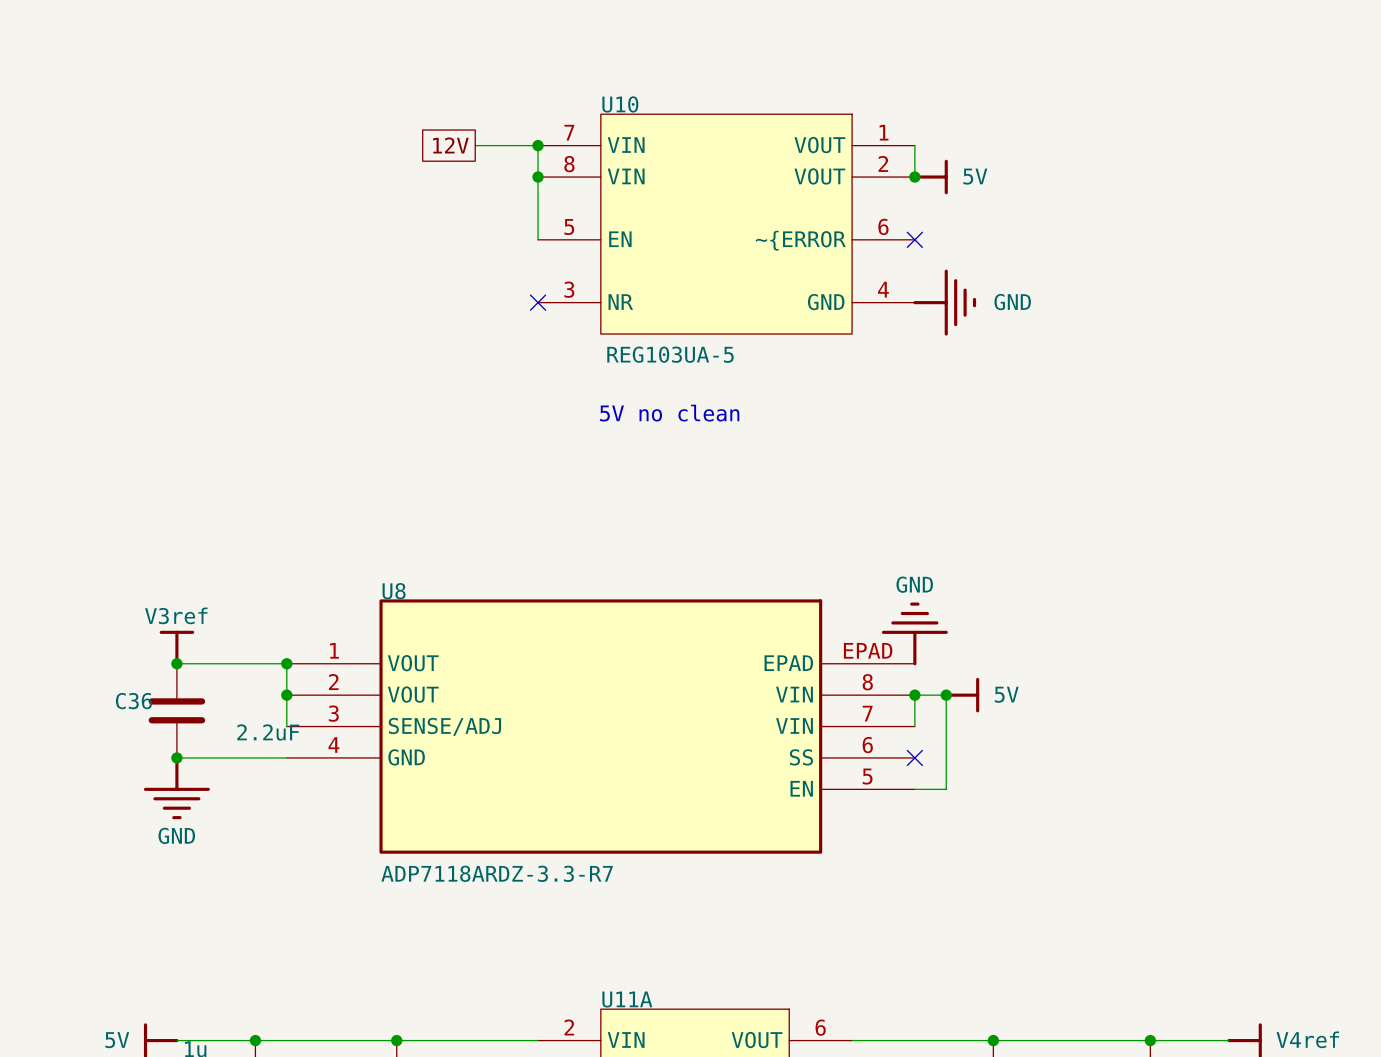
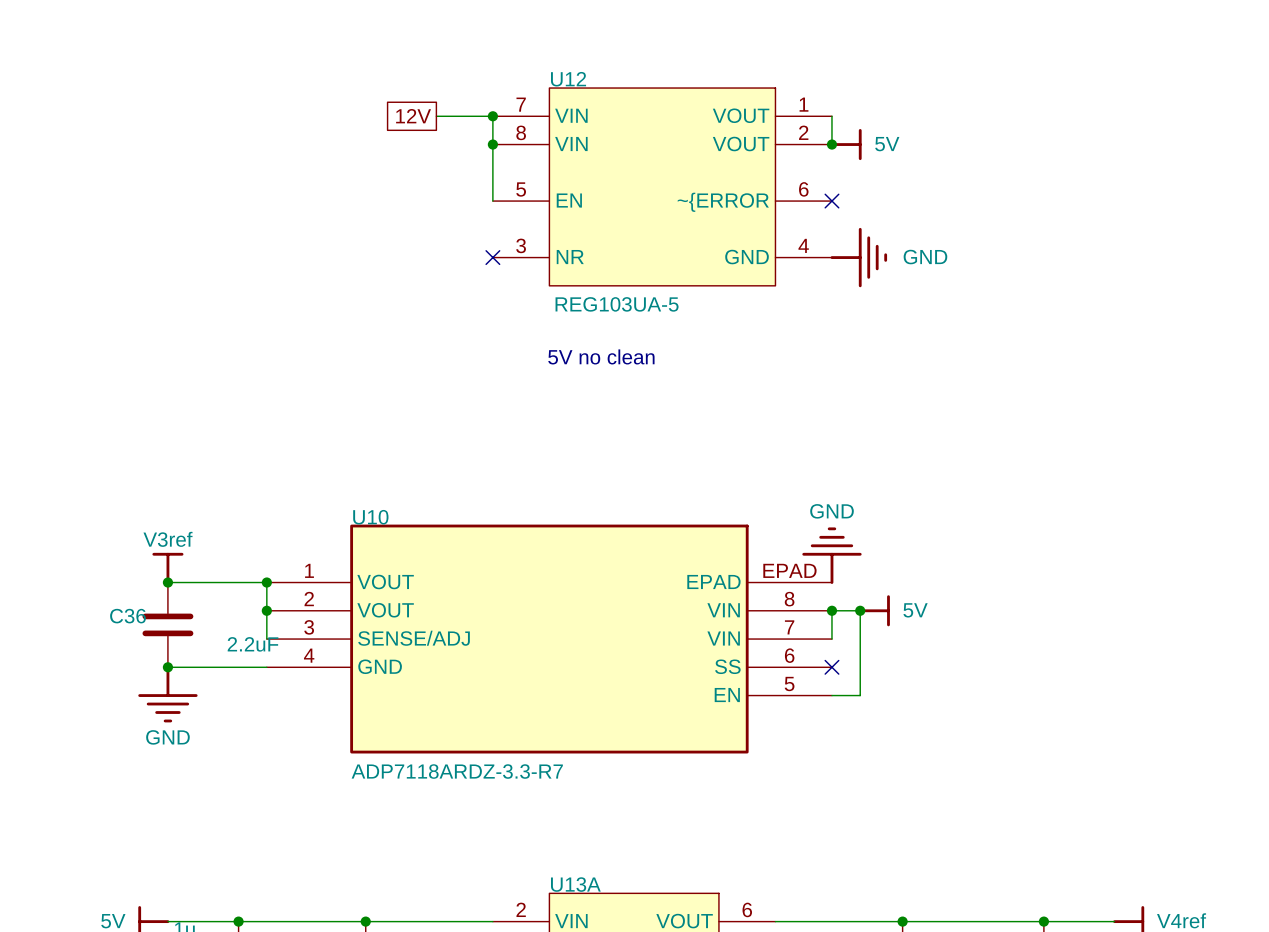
U10 name: U10 (620, 104) -> U12 (568, 79)
U8 name: U8 (394, 591) -> U10 (370, 517)
U11A name: U11A (627, 999) -> U13A (575, 884)

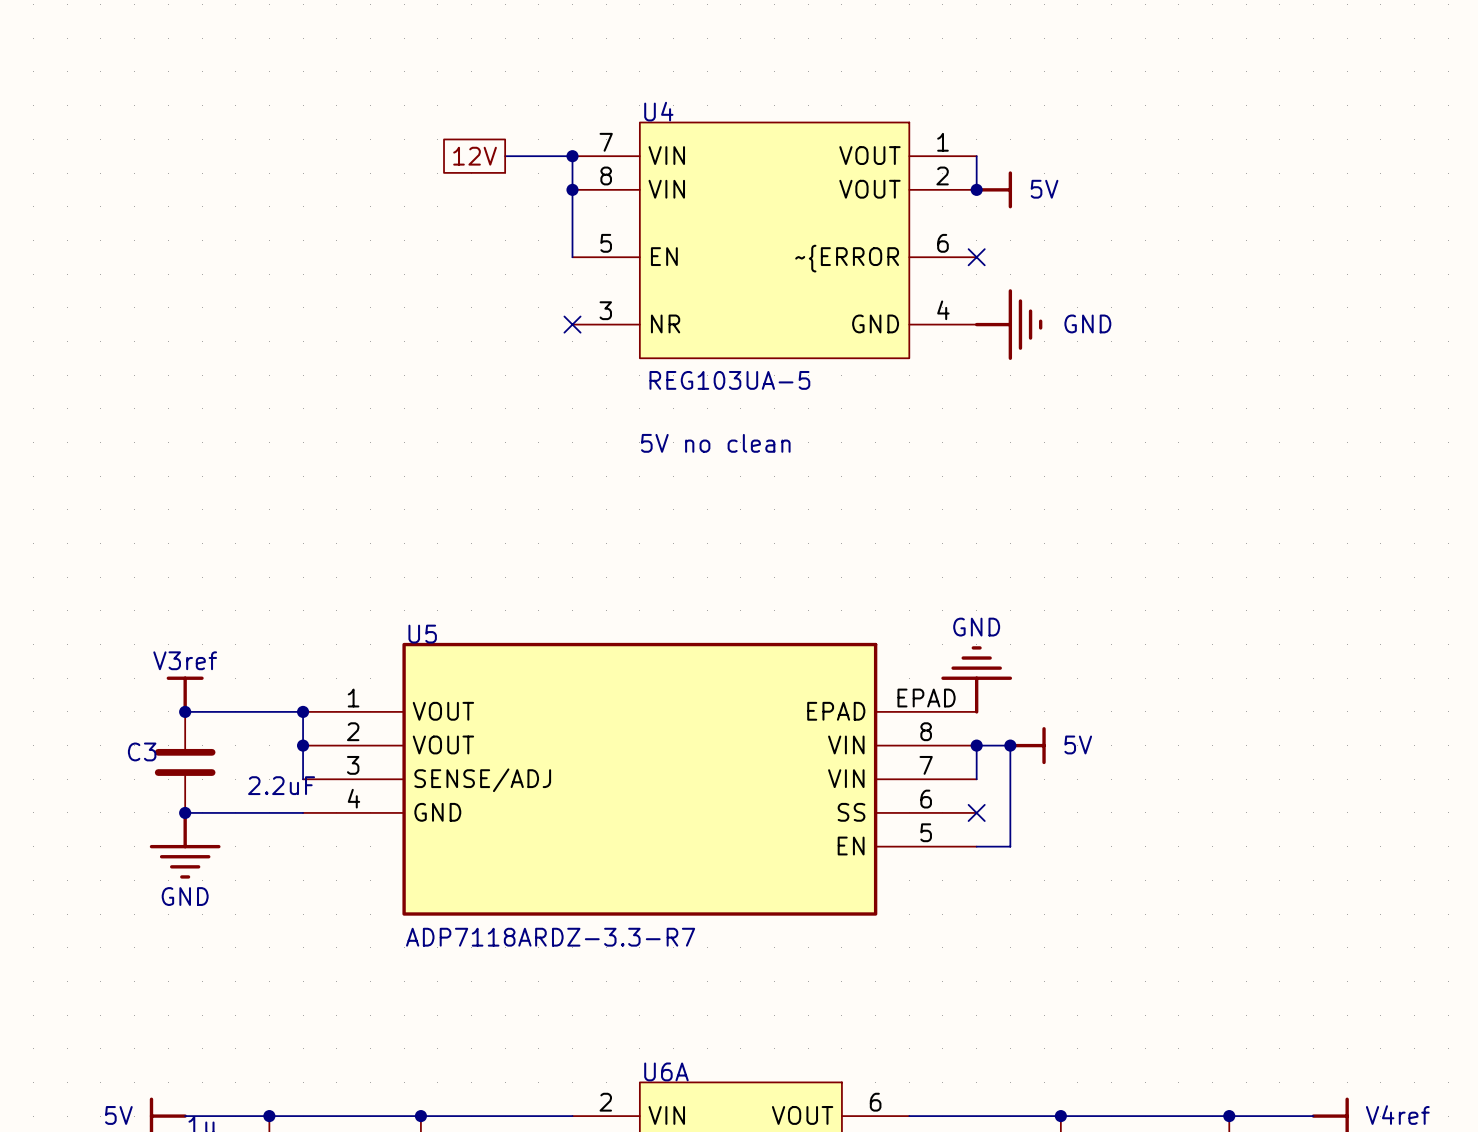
U12 name: U12 (568, 79) -> U4 (658, 111)
U10 name: U10 (370, 517) -> U5 (422, 634)
C36 name: C36 (127, 616) -> C3 (142, 751)
U13A name: U13A (575, 884) -> U6A (666, 1071)

